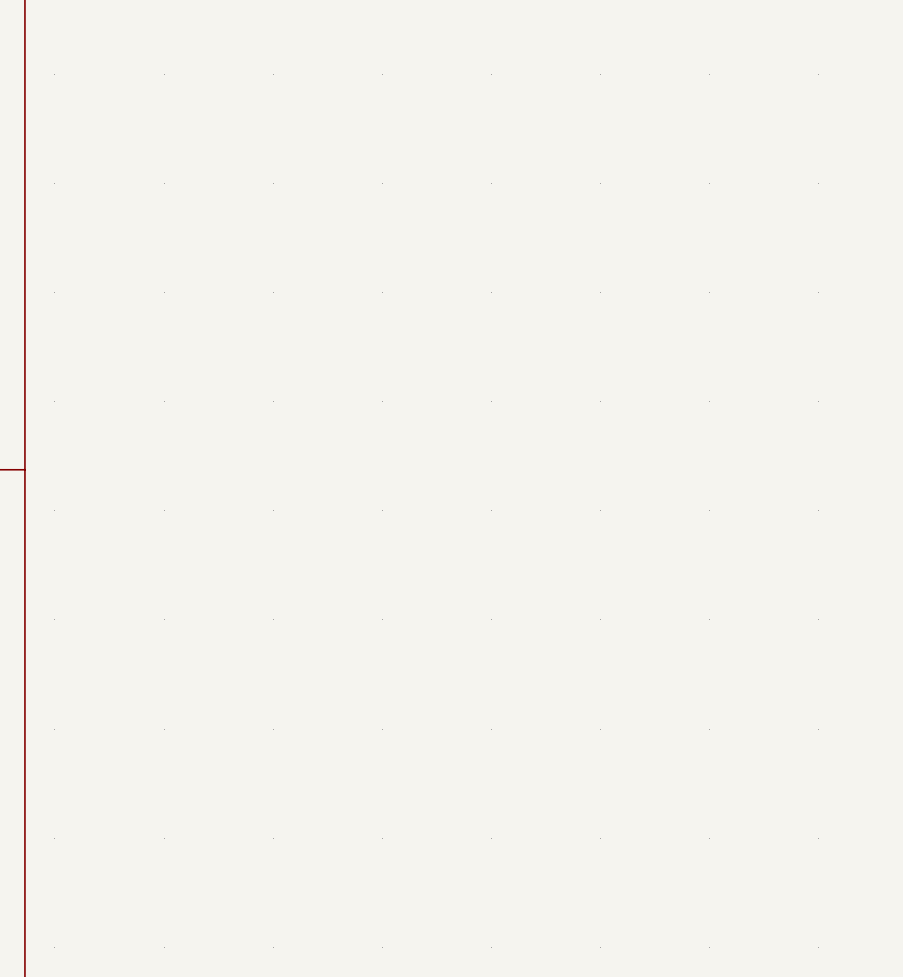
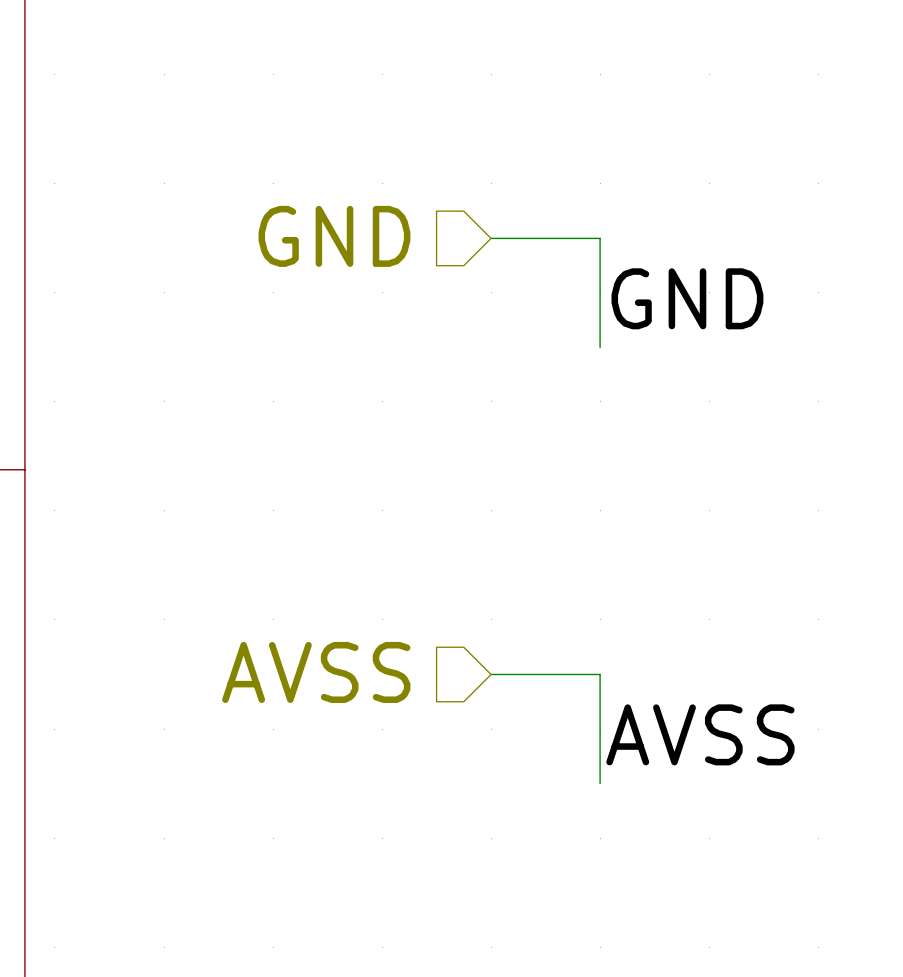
hierarchical label: none -> GND (334, 236)
wire: none -> (491, 238) (600, 238) (600, 347)
label: none -> GND (687, 298)
hierarchical label: none -> AVSS (316, 672)
wire: none -> (491, 674) (600, 674) (600, 783)
label: none -> AVSS (700, 734)

